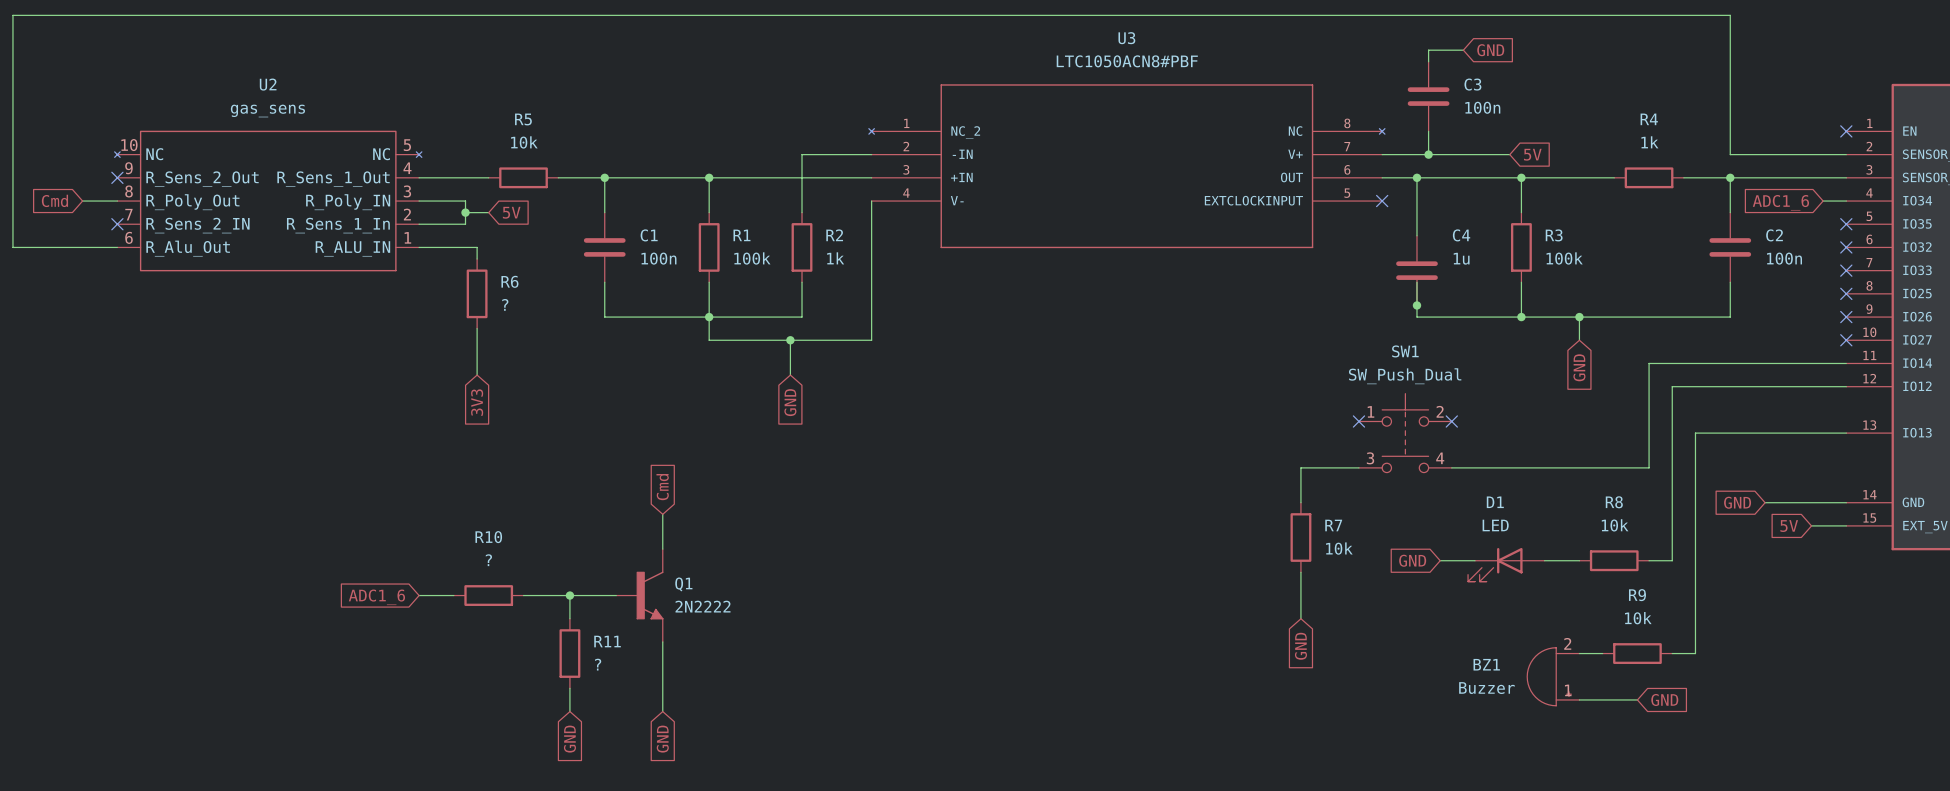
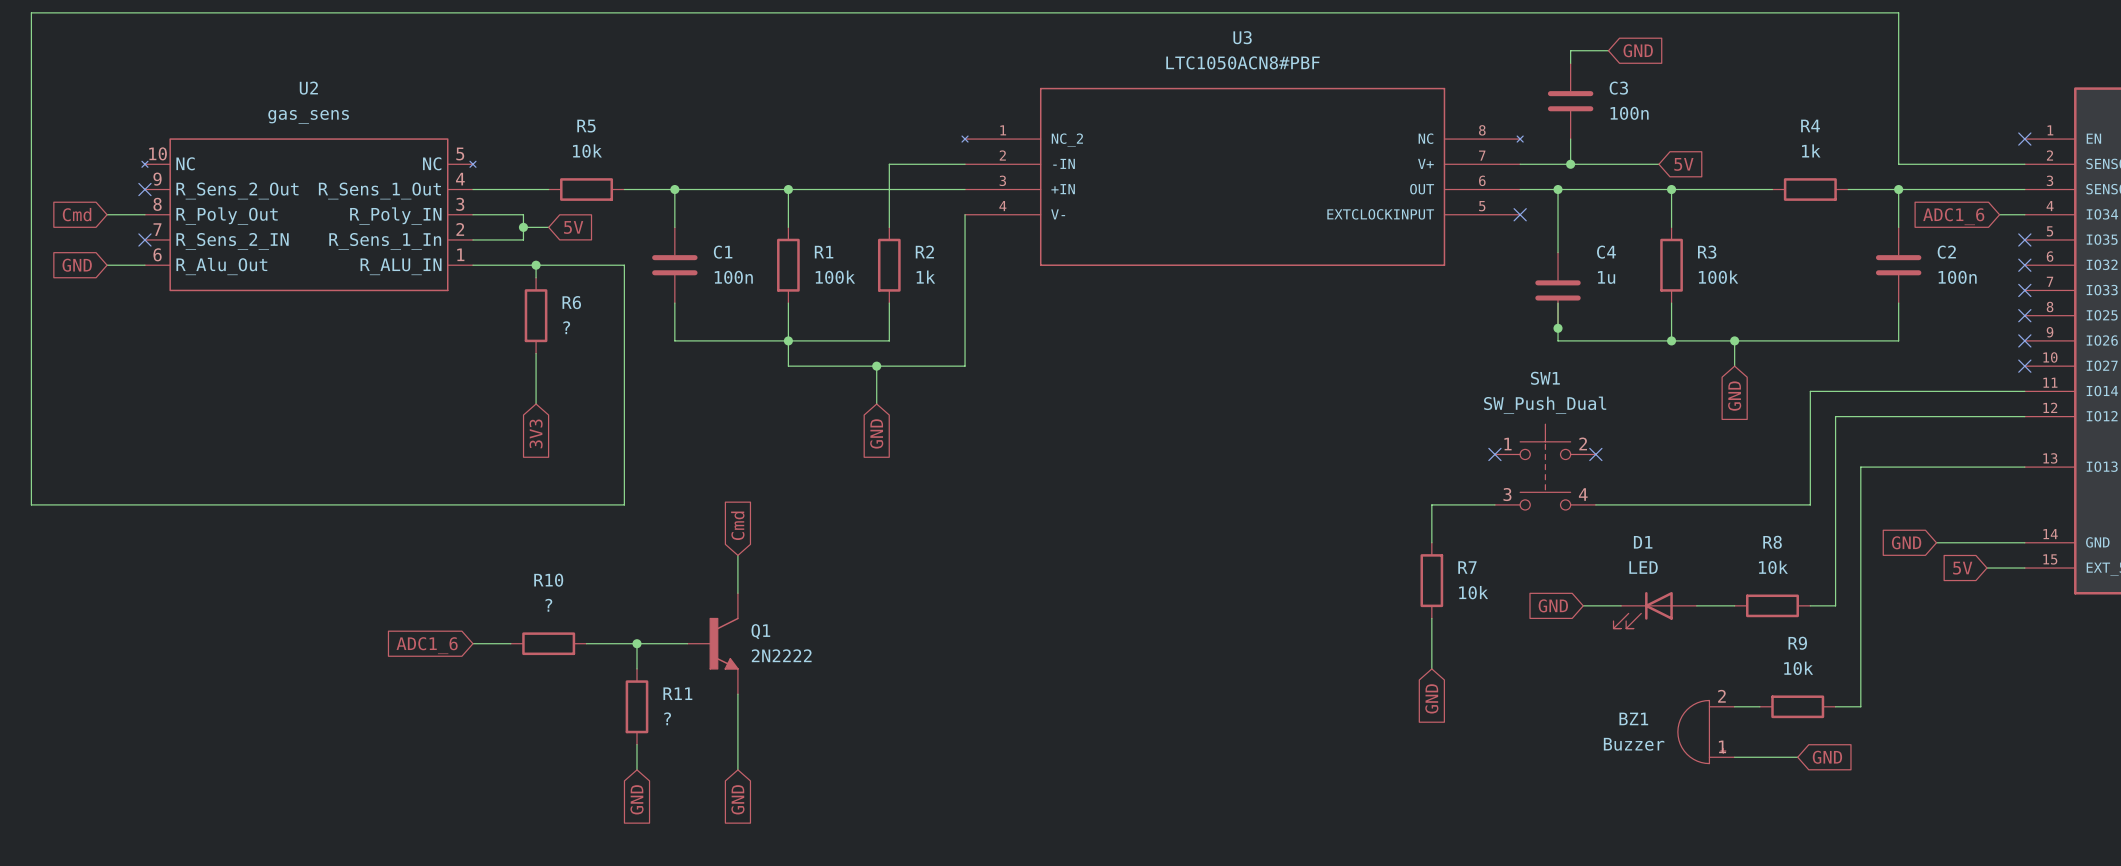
wire: (12, 247) (82, 247) -> (31, 265) (31, 504) (624, 504) (624, 265) (536, 265)
global label: none -> GND (77, 265)
junction: none -> (536, 265)

